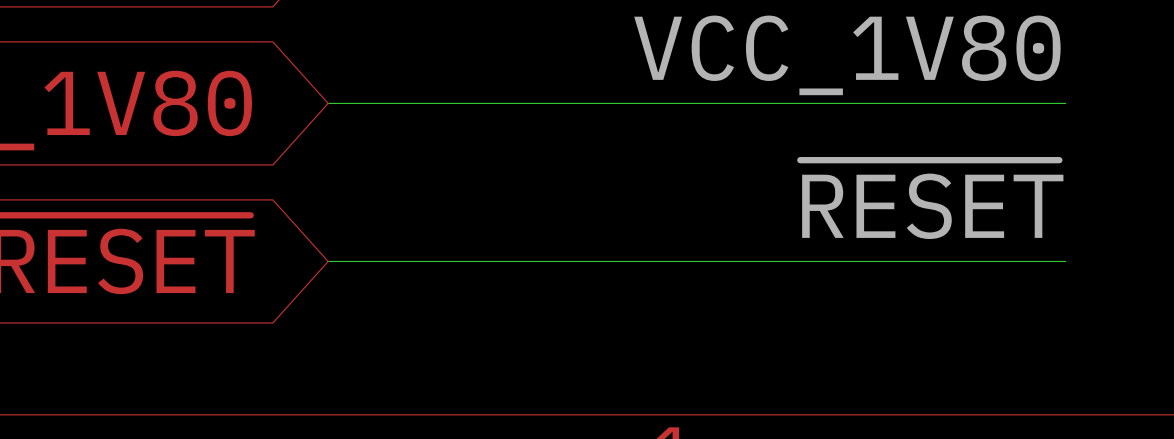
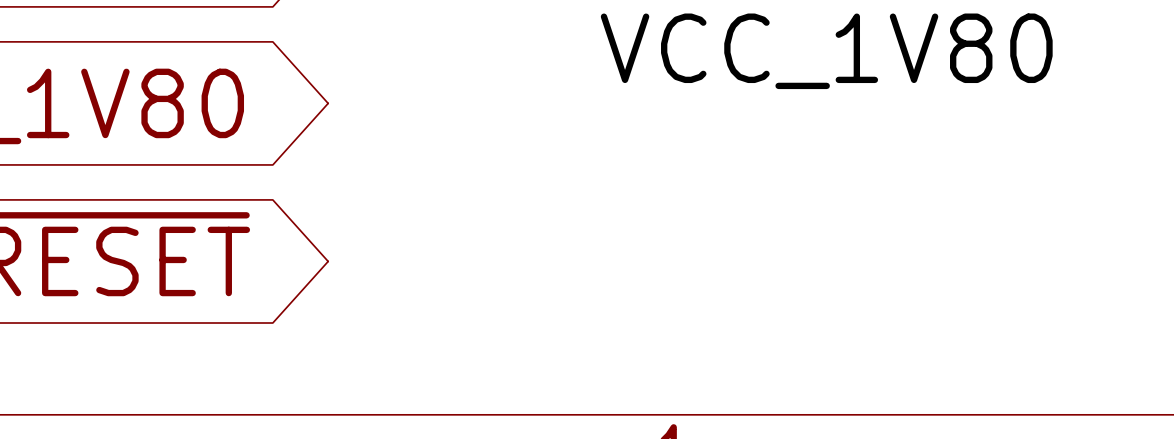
wire: (328, 103) (1065, 103) -> none
label: ~{RESET} (931, 199) -> none
wire: (328, 261) (1065, 261) -> none

